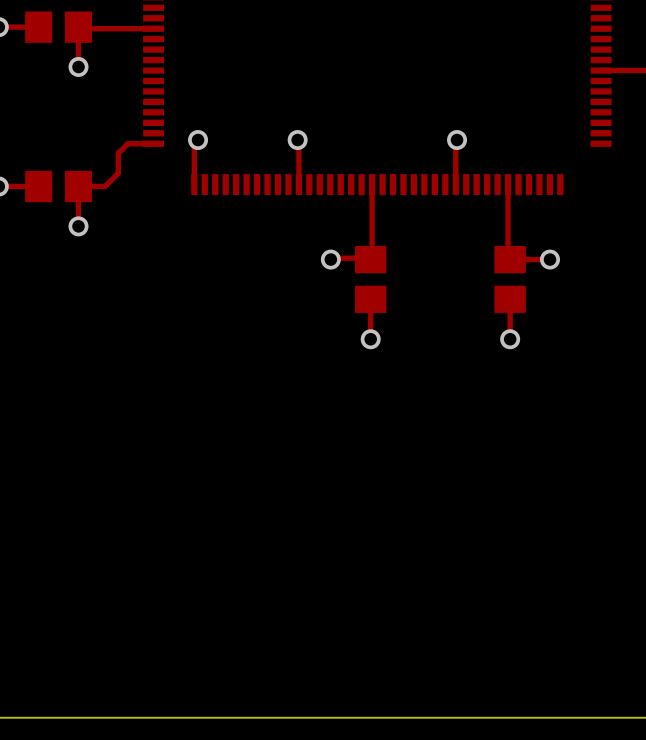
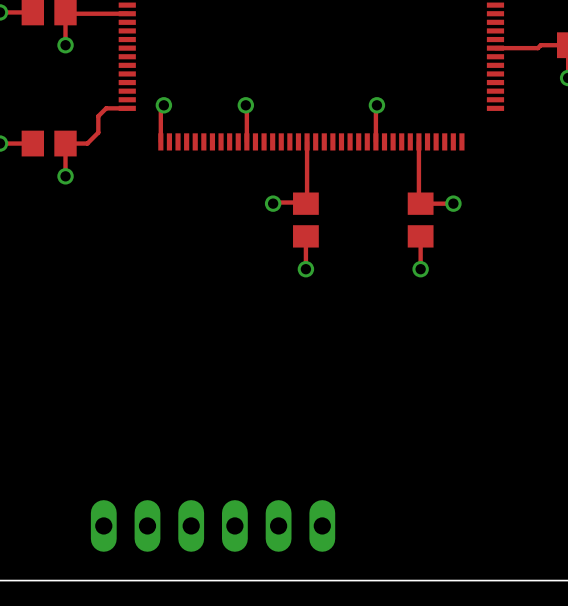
part: none -> (213, 525)

